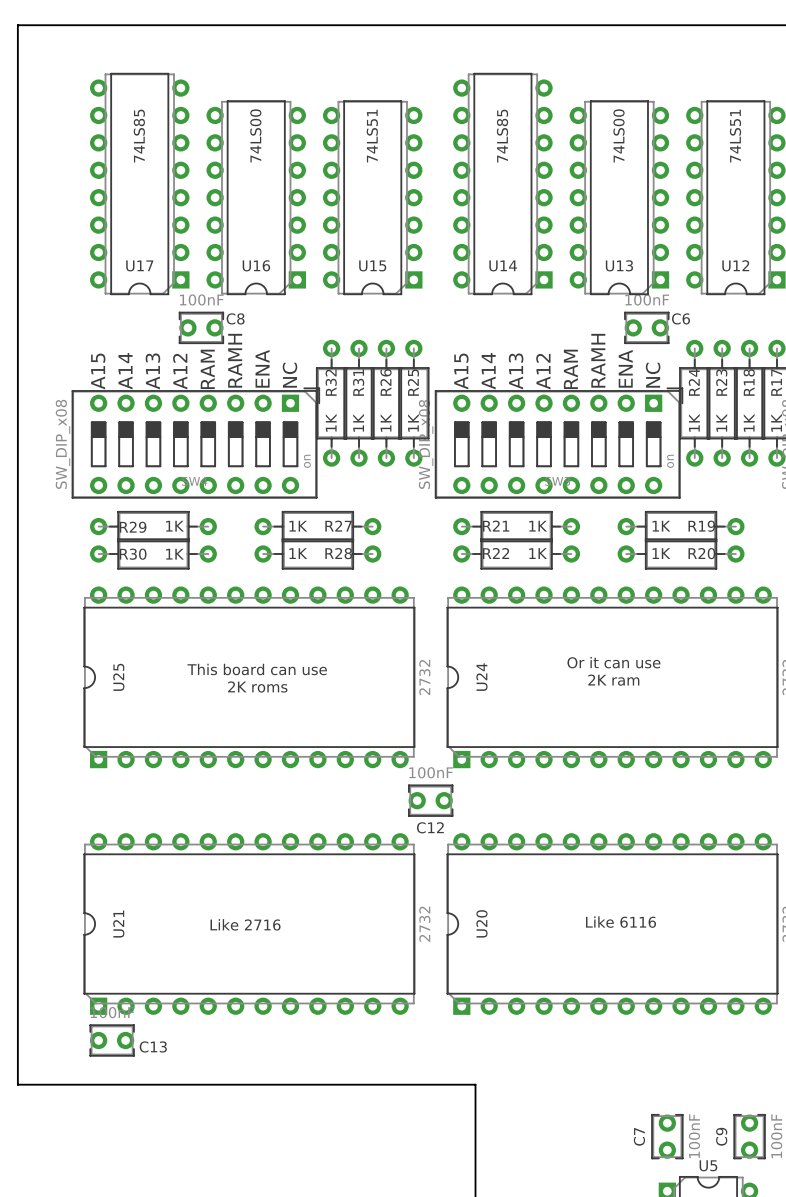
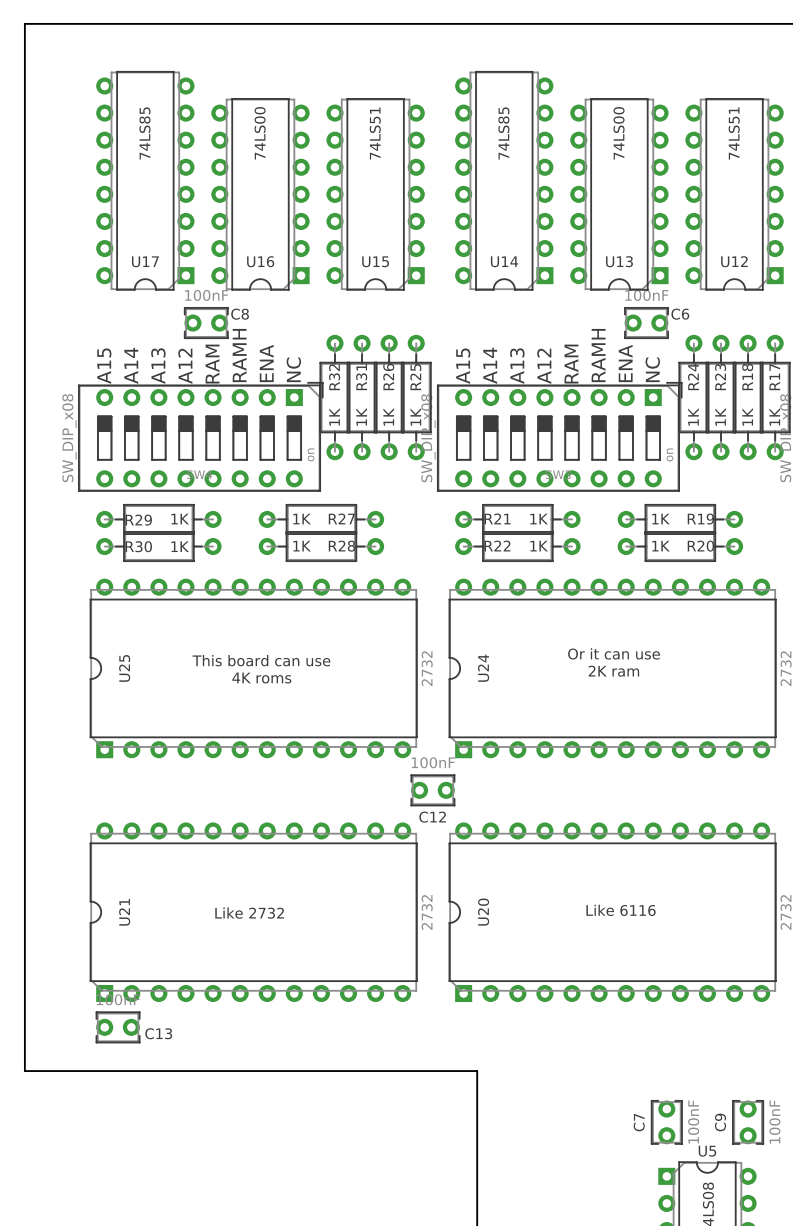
text: 2K roms (257, 687) -> 4K roms (261, 678)
text: Like 2716 (245, 924) -> Like 2732 (249, 913)

